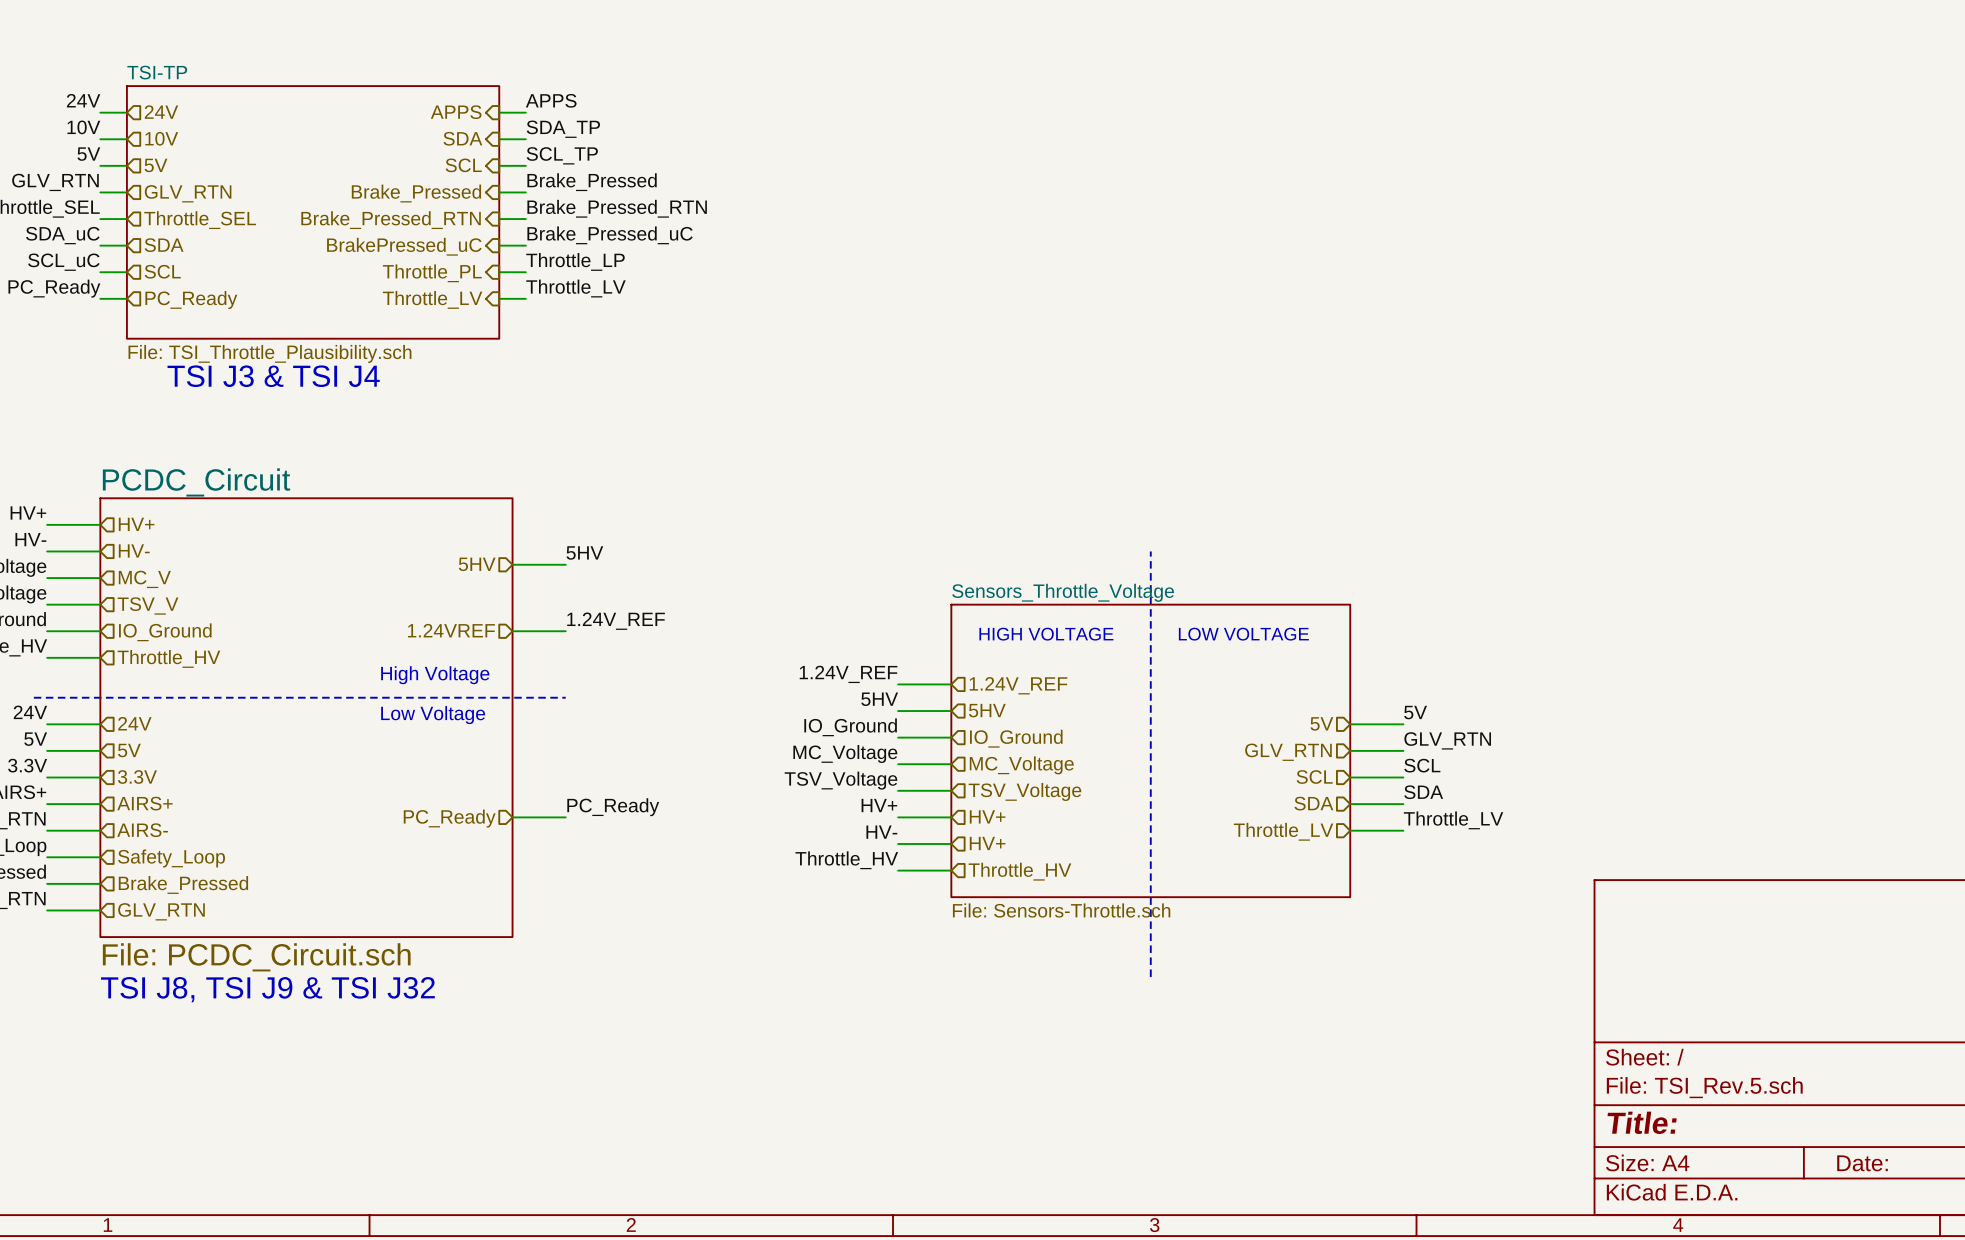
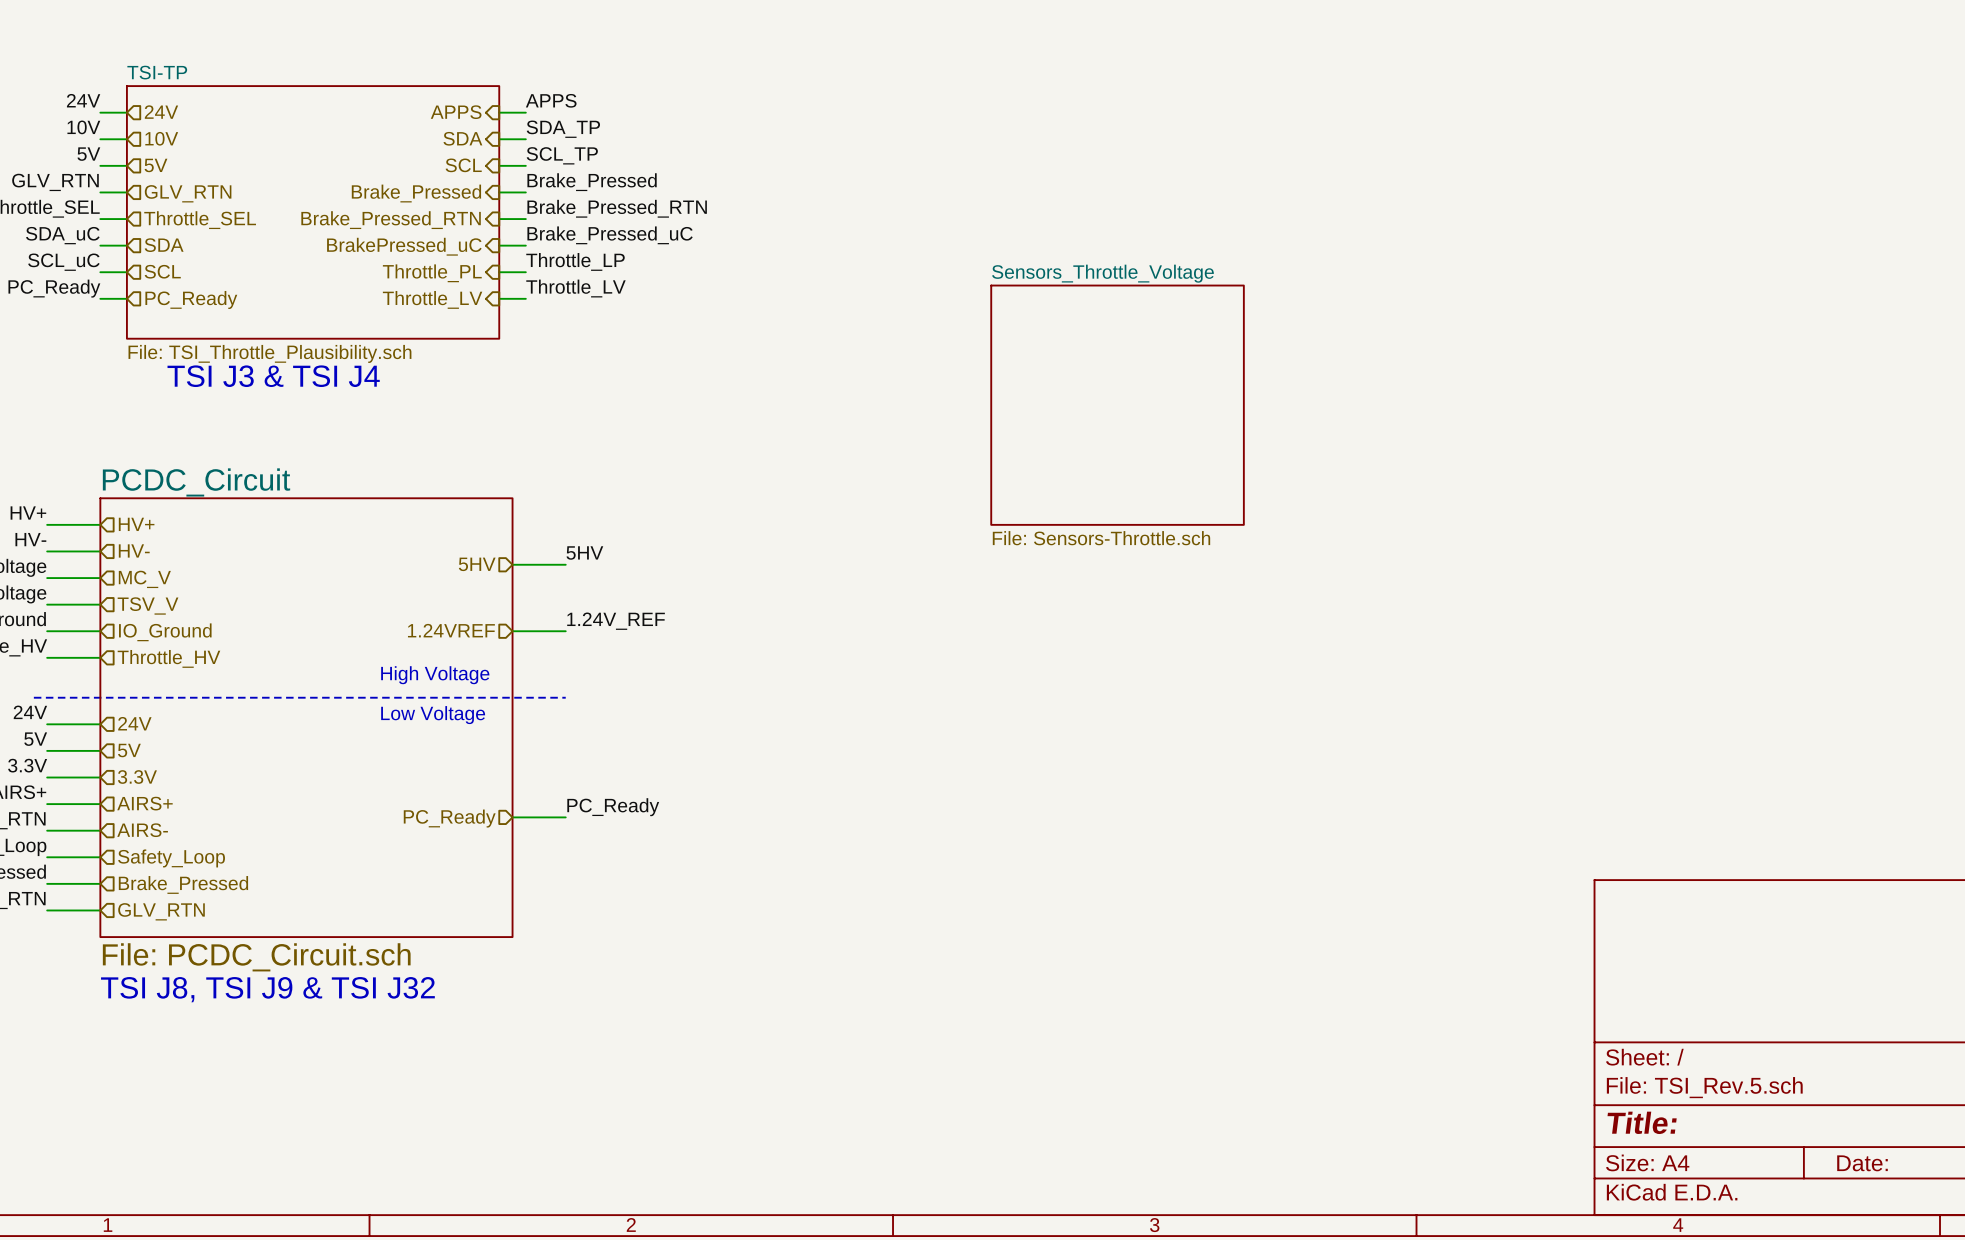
sheet Sensors_Throttle_Voltage: none -> File: Sensors-Throttle.sch (1117, 405)
line: (1150, 551) (1150, 976) -> none
text: HIGH VOLTAGE (1046, 634) -> none
text: LOW VOLTAGE (1243, 634) -> none
label: 1.24V_REF (848, 674) -> none
wire: (898, 684) (951, 684) -> none
hierarchical label: 1.24V_REF (1018, 685) -> none
label: 5HV (879, 699) -> none
hierarchical label: 5HV (987, 710) -> none
wire: (898, 711) (951, 711) -> none
label: 5V (1415, 712) -> none
hierarchical label: 5V (1321, 723) -> none
wire: (1350, 724) (1403, 724) -> none
label: IO_Ground (850, 727) -> none
wire: (898, 737) (951, 737) -> none
hierarchical label: IO_Ground (1016, 738) -> none
label: GLV_RTN (1447, 740) -> none
sheet Sensors_Throttle_Voltage: File: Sensors-Throttle.sch (1150, 750) -> none
wire: (1350, 750) (1403, 750) -> none
hierarchical label: GLV_RTN (1288, 752) -> none
label: MC_Voltage (845, 753) -> none
wire: (898, 764) (951, 764) -> none
hierarchical label: MC_Voltage (1021, 765) -> none
label: SCL (1422, 765) -> none
hierarchical label: SCL (1314, 777) -> none
wire: (1350, 777) (1403, 777) -> none
label: TSV_Voltage (840, 780) -> none
wire: (898, 790) (951, 790) -> none
hierarchical label: TSV_Voltage (1024, 791) -> none
label: SDA (1423, 792) -> none
hierarchical label: SDA (1313, 803) -> none
wire: (1350, 804) (1403, 804) -> none
label: HV+ (879, 805) -> none
hierarchical label: HV+ (987, 816) -> none
wire: (898, 817) (951, 817) -> none
label: Throttle_LV (1453, 820) -> none
wire: (1350, 830) (1403, 830) -> none
hierarchical label: Throttle_LV (1283, 831) -> none
label: HV- (881, 832) -> none
wire: (898, 843) (951, 843) -> none
hierarchical label: HV+ (987, 843) -> none
label: Throttle_HV (846, 860) -> none
wire: (898, 870) (951, 870) -> none
hierarchical label: Throttle_HV (1019, 871) -> none

